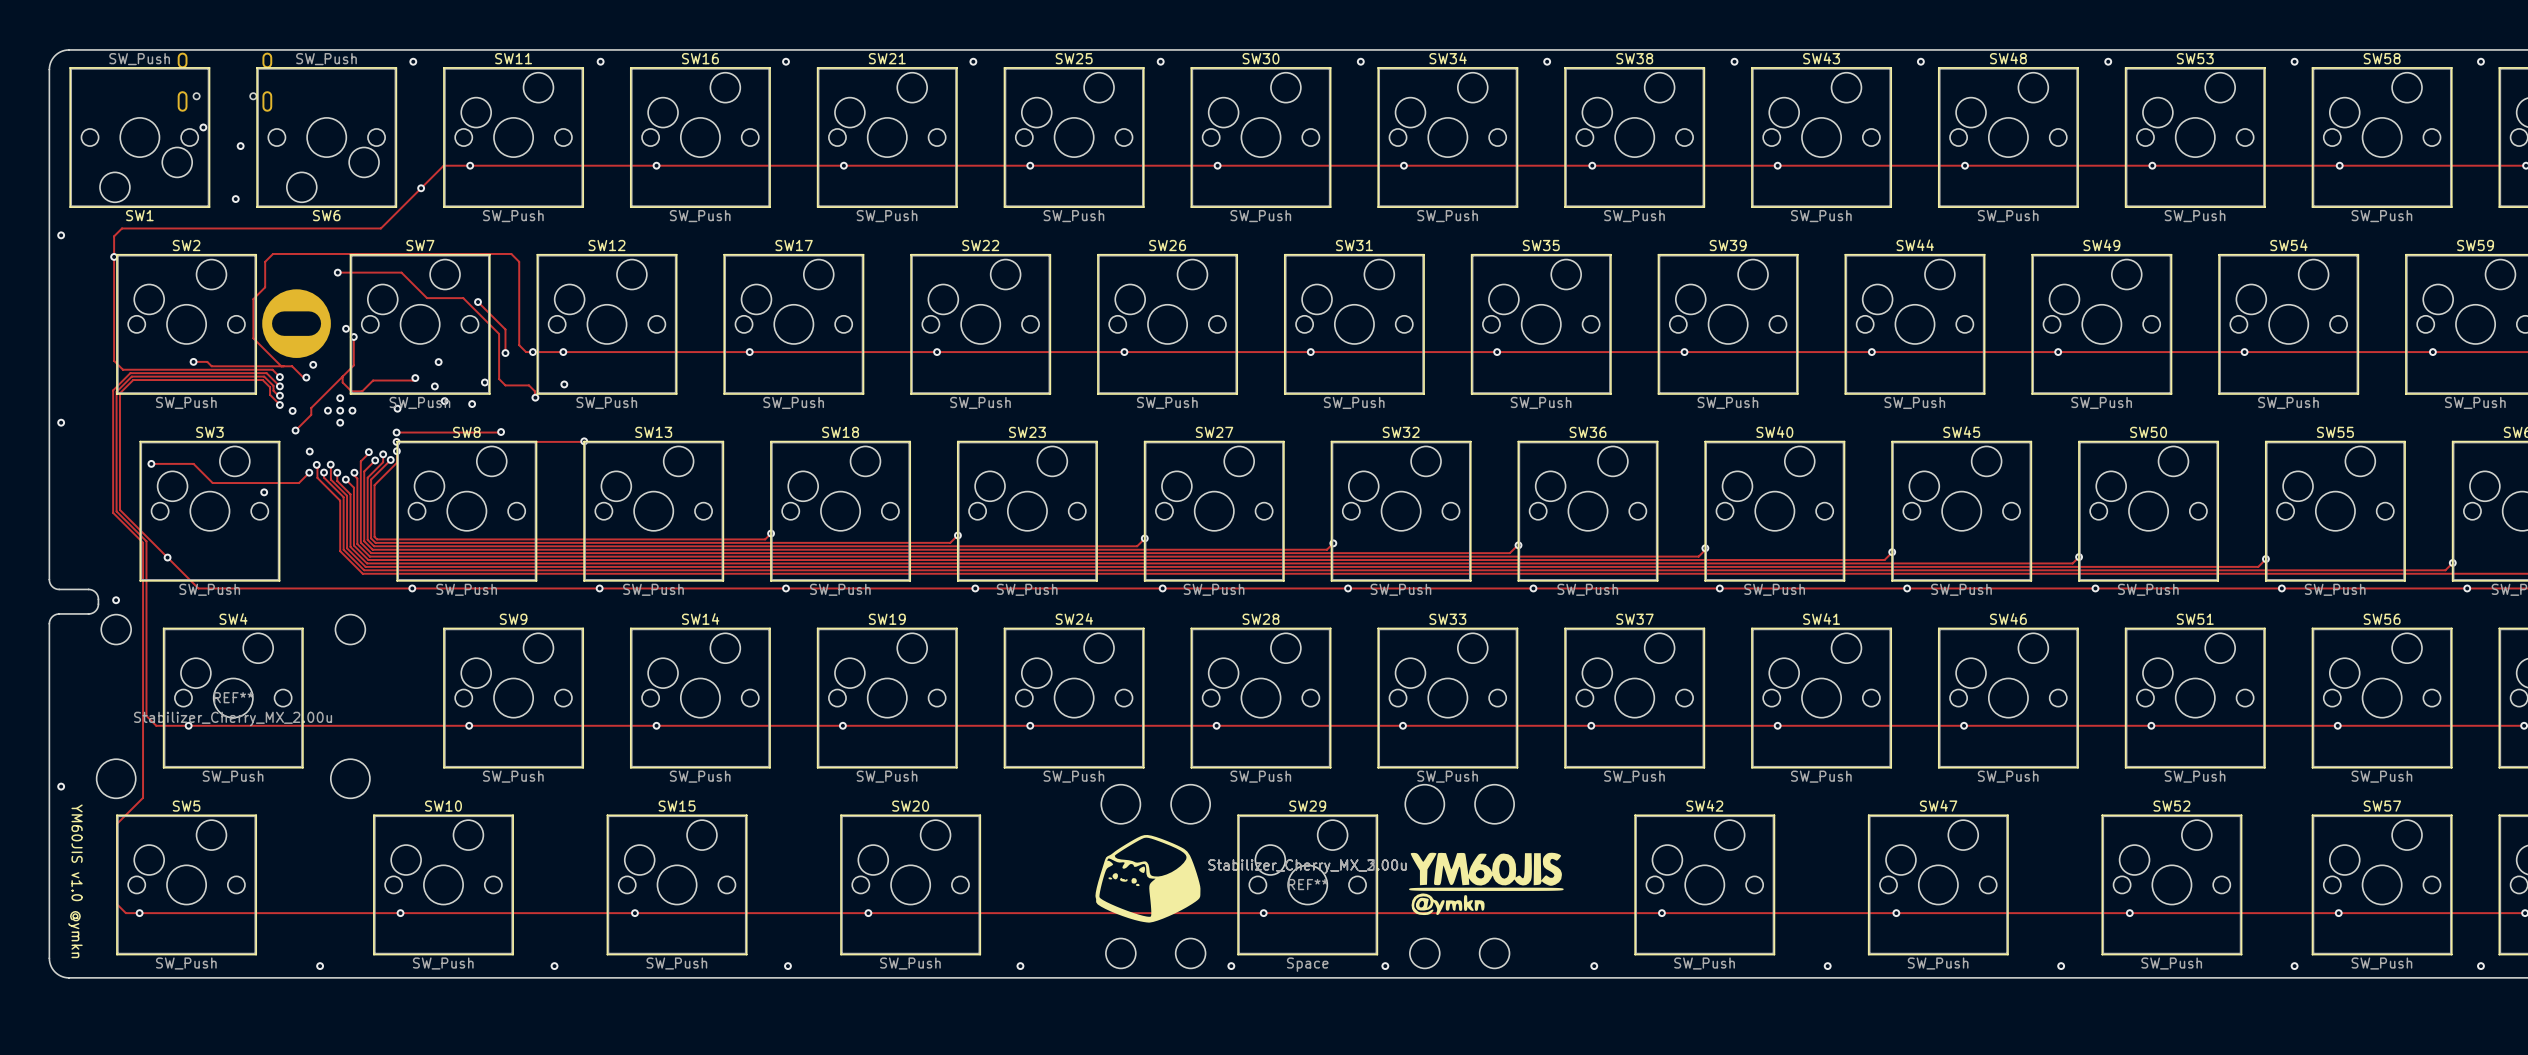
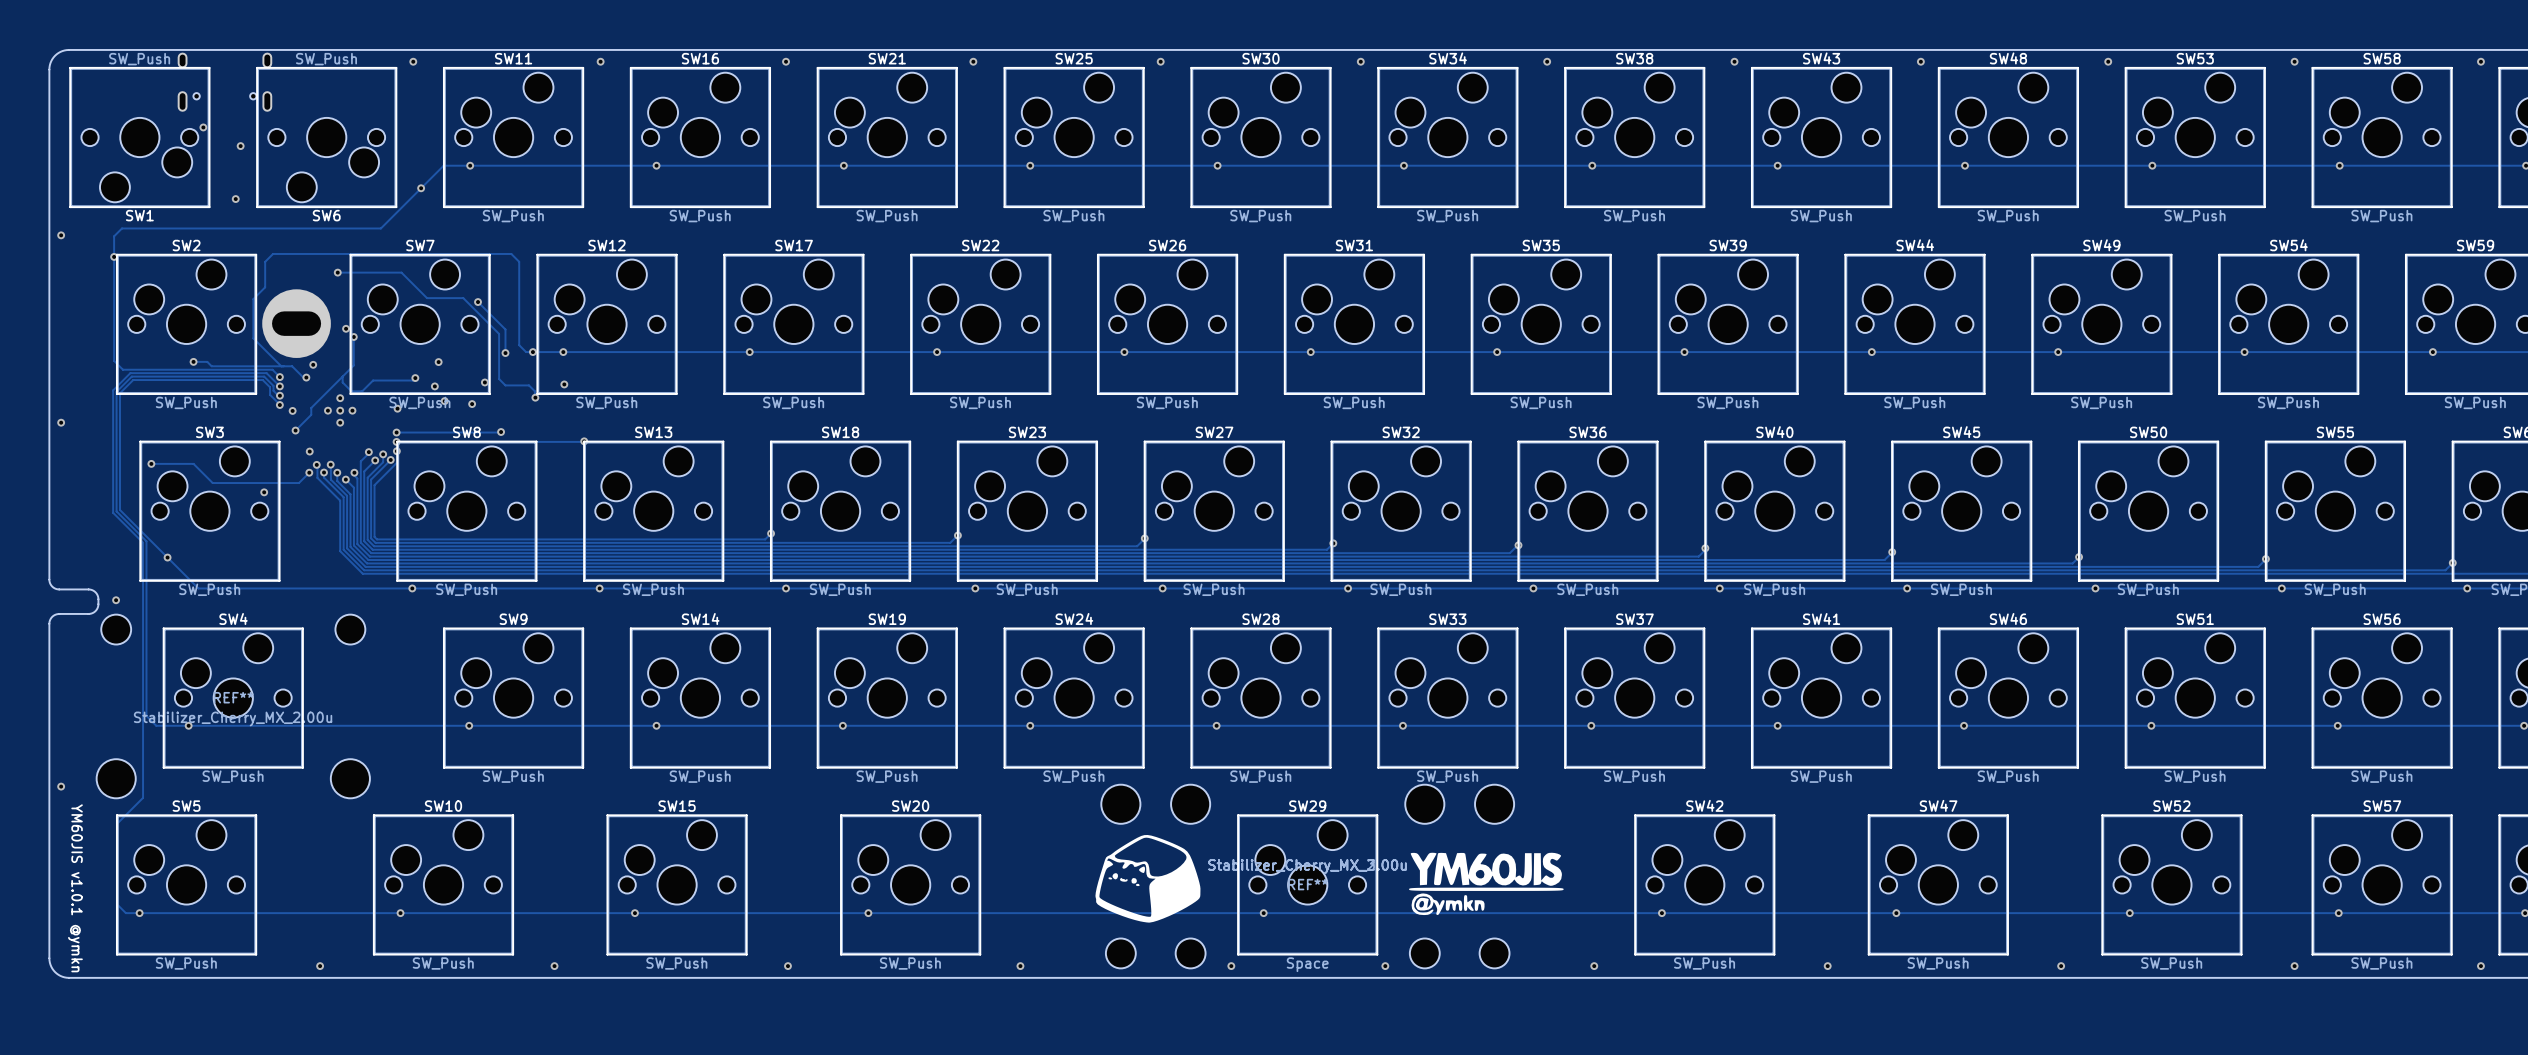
text: YM60JIS v1.0 @ymkn (75, 881) -> YM60JIS v1.0.1 @ymkn (75, 888)

